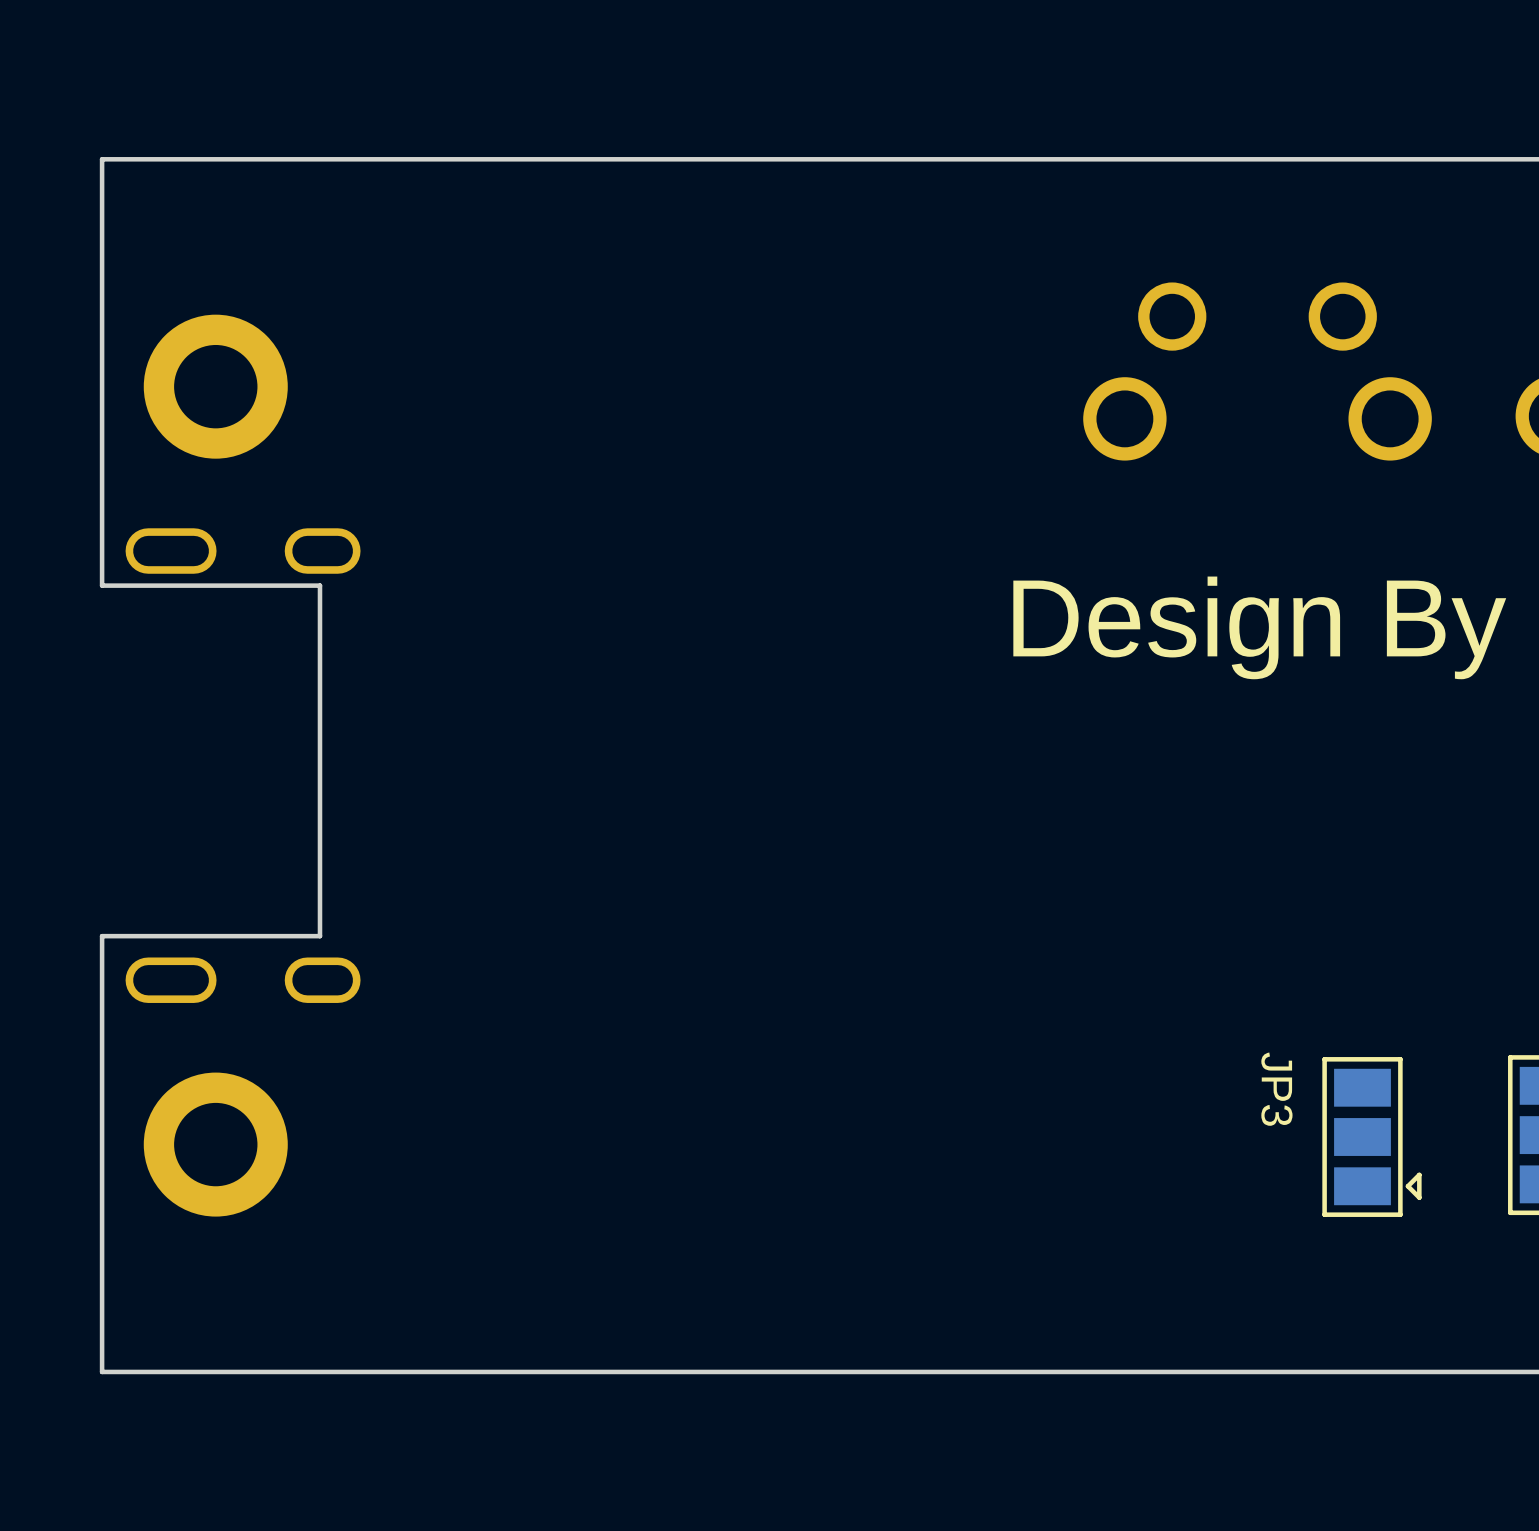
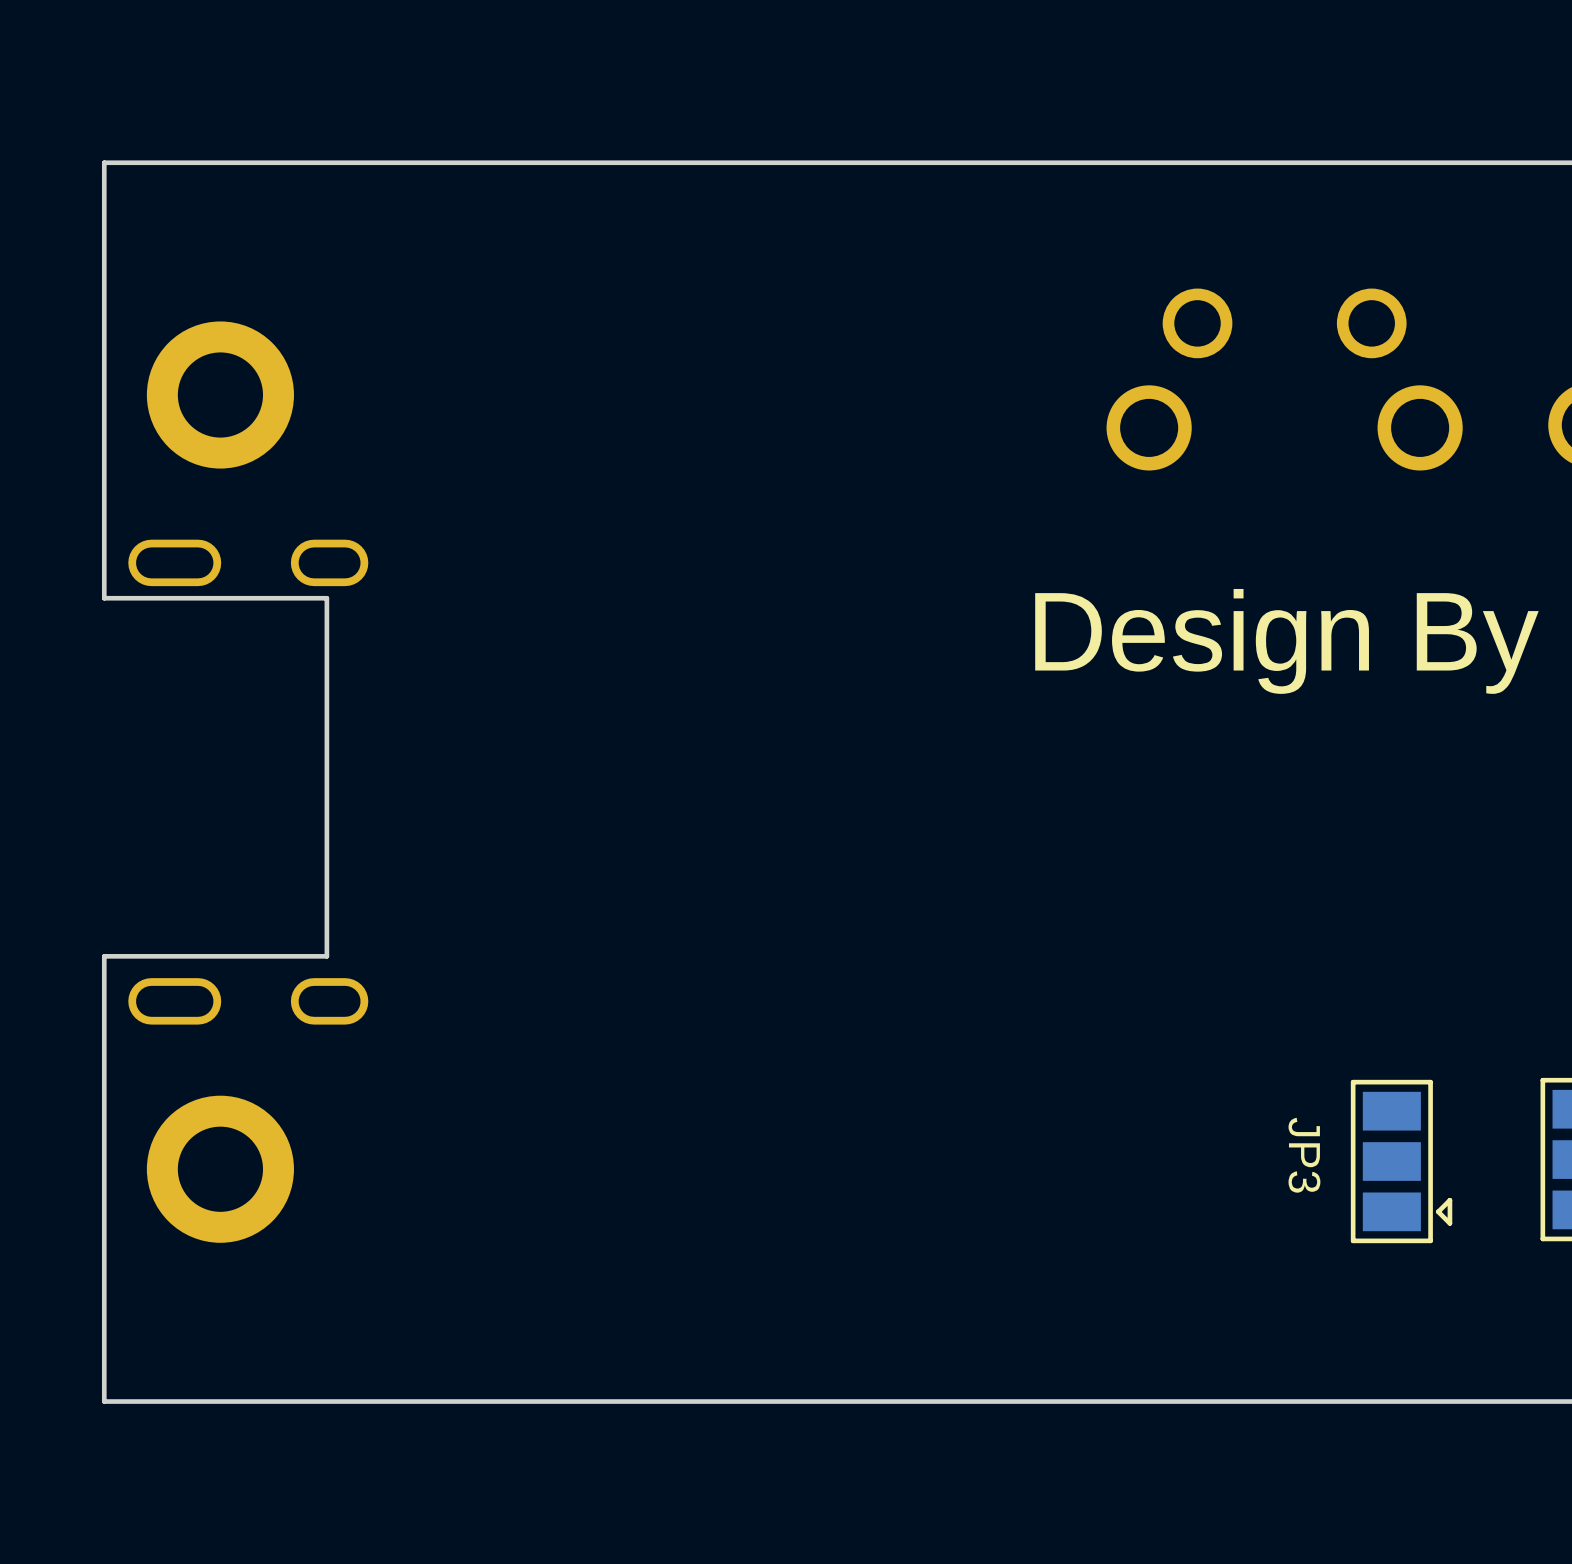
JP3 name position: JP3 (1276, 1089) -> JP3 (1304, 1155)

